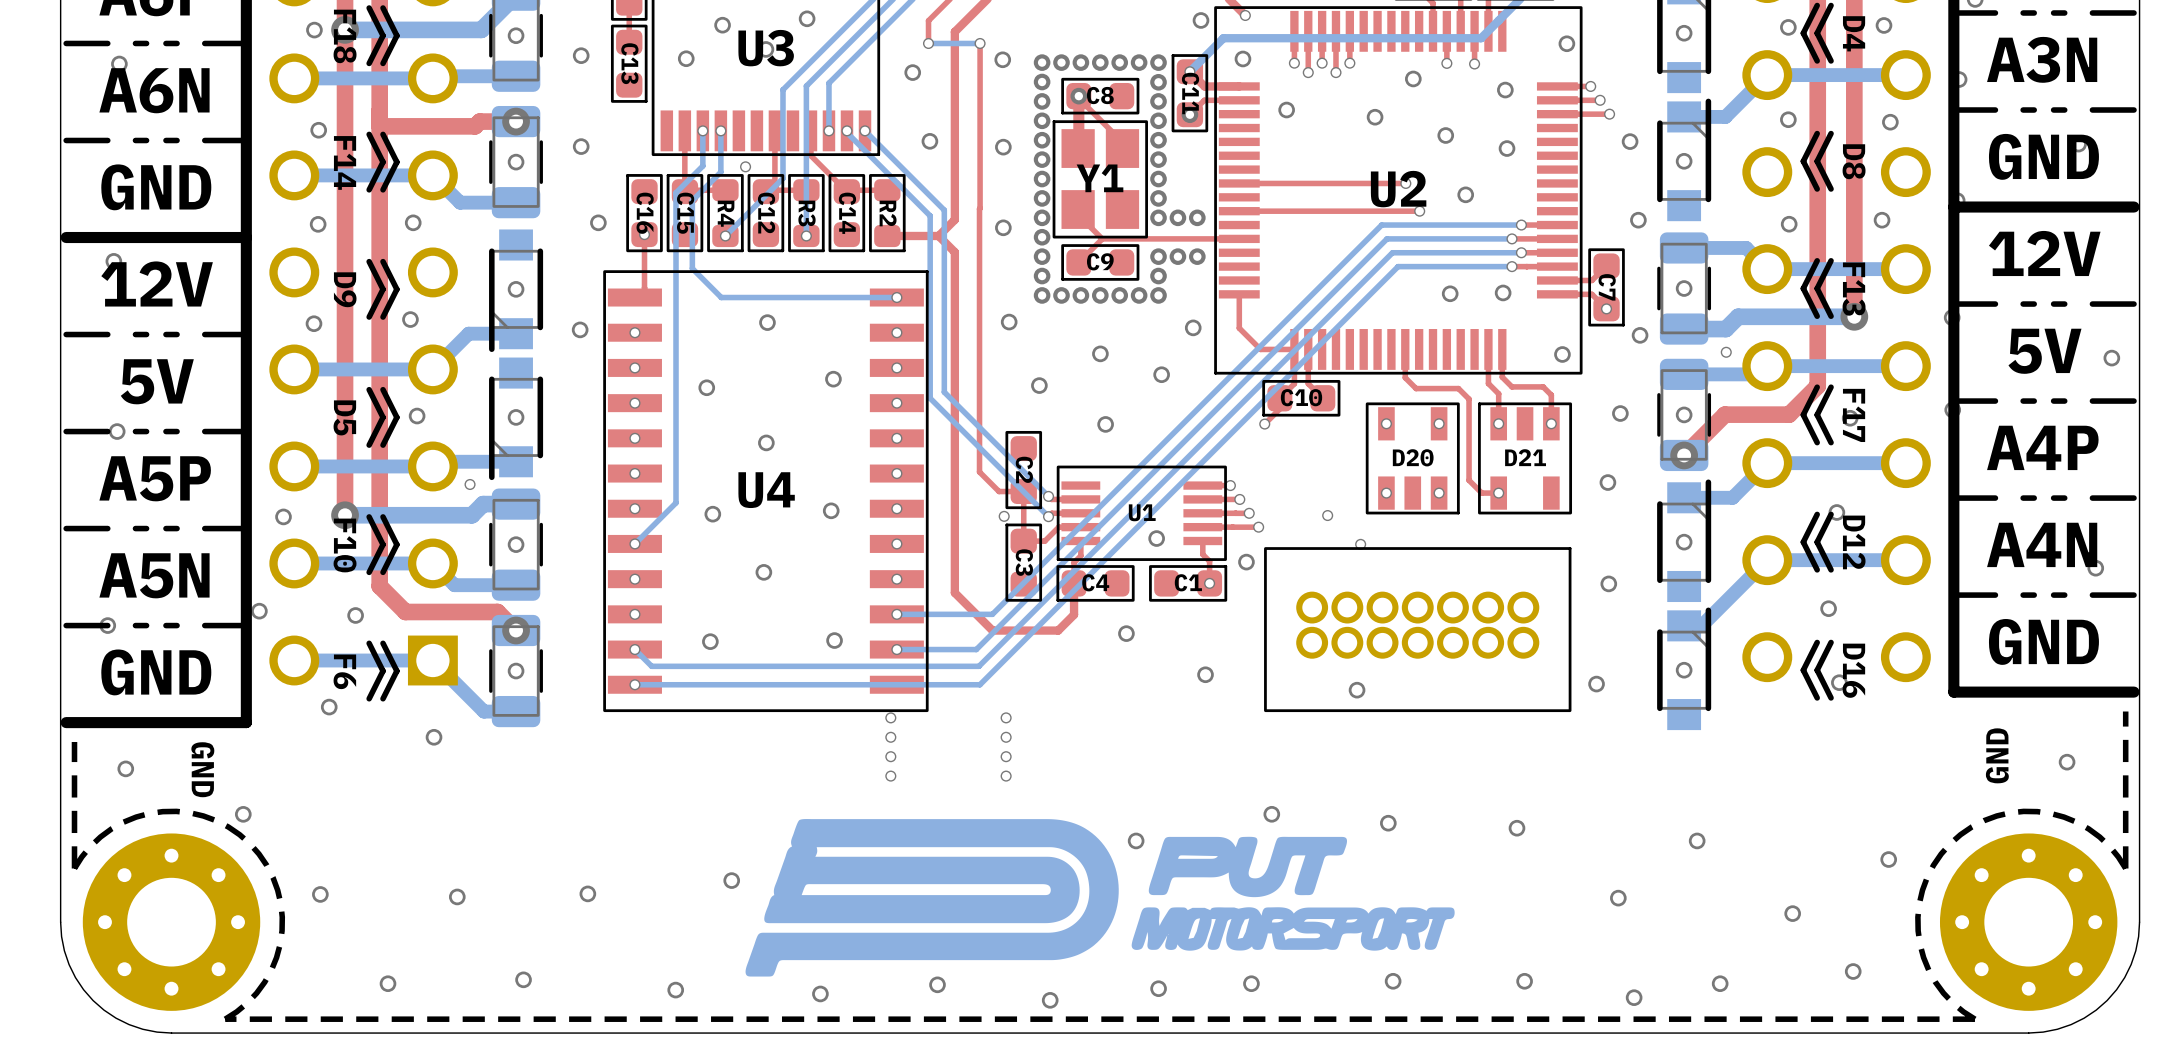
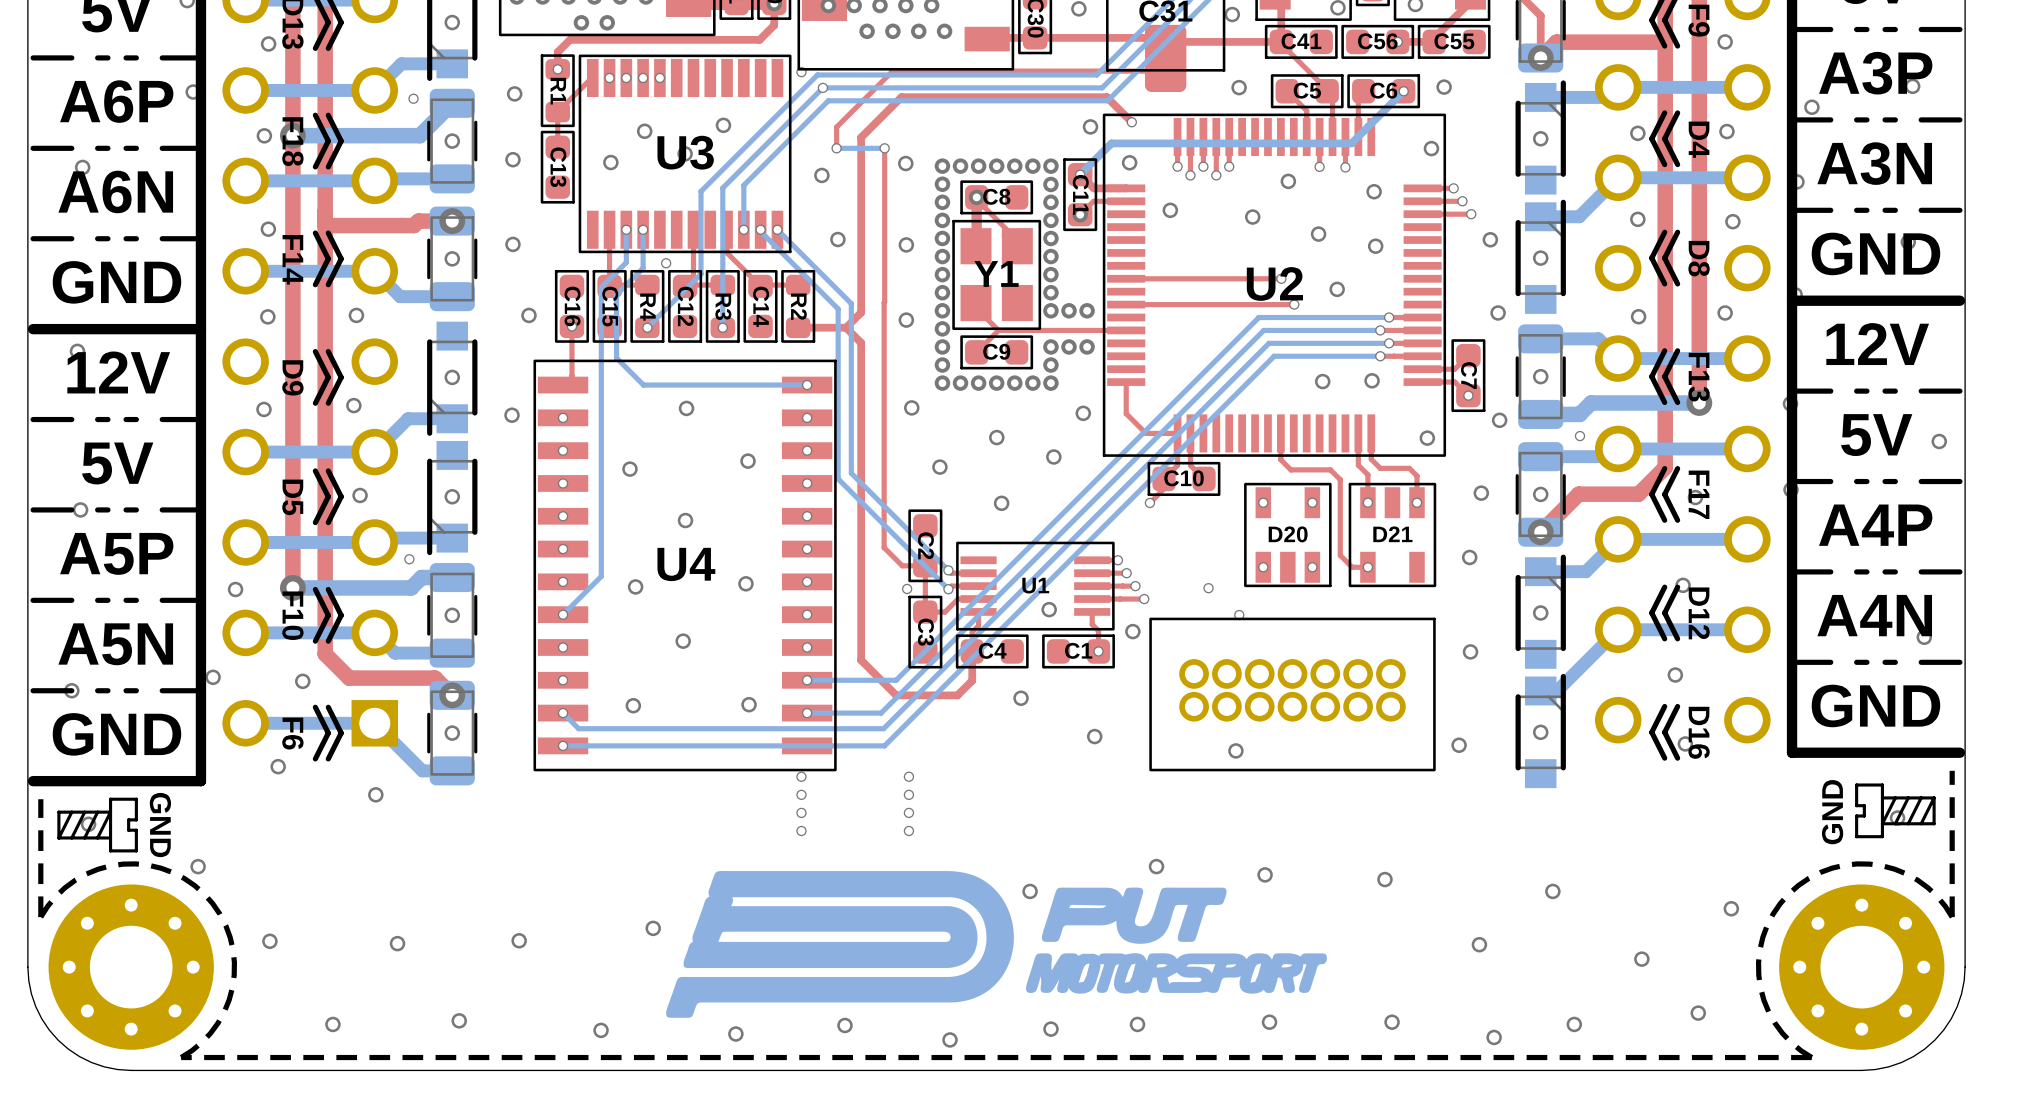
drawing: none -> [1855, 783, 1936, 839]
drawing: none -> [57, 797, 138, 853]

